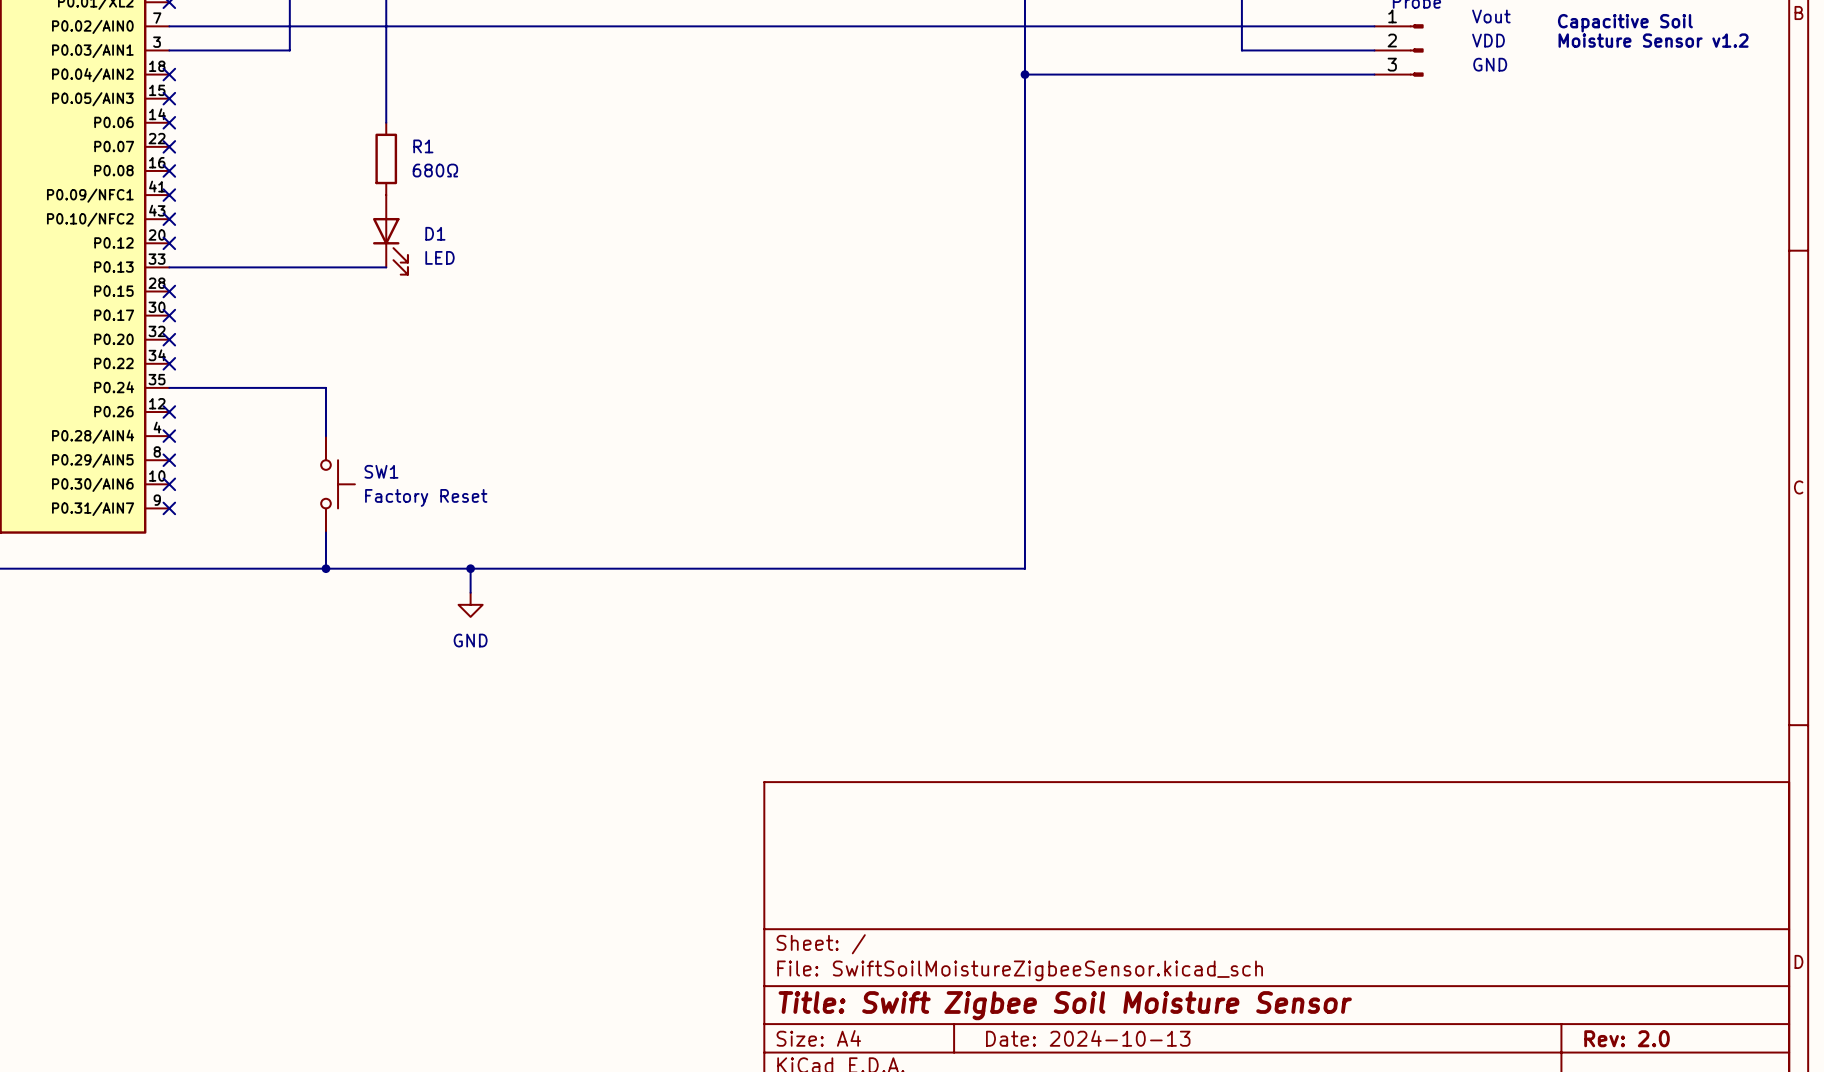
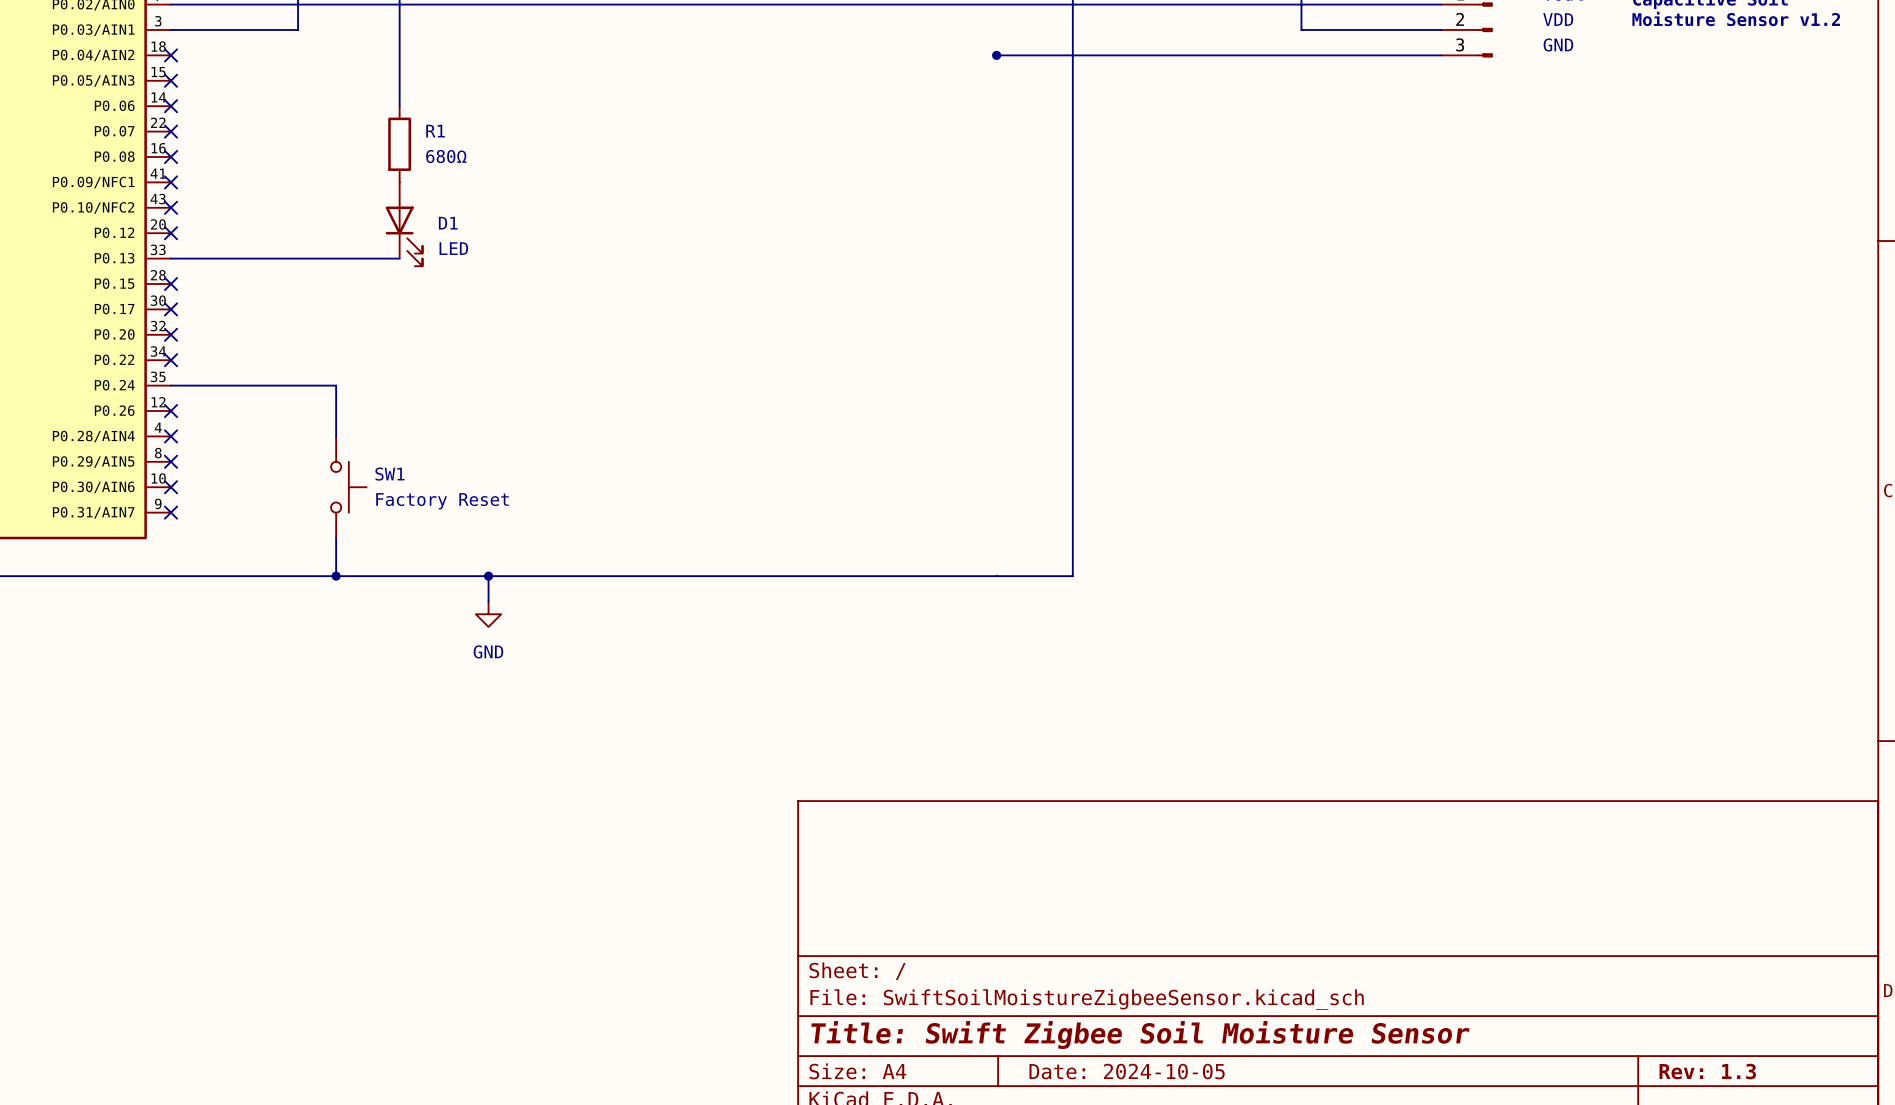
wire: none -> (996, 55) (1072, 55)
junction: none -> (996, 55)
junction: (1024, 74) -> none
title block: Date: 2024-10-13 (1088, 1038) -> Date: 2024-10-05 (1127, 1071)
title block: Rev: 2.0 (1627, 1038) -> Rev: 1.3 (1707, 1071)

